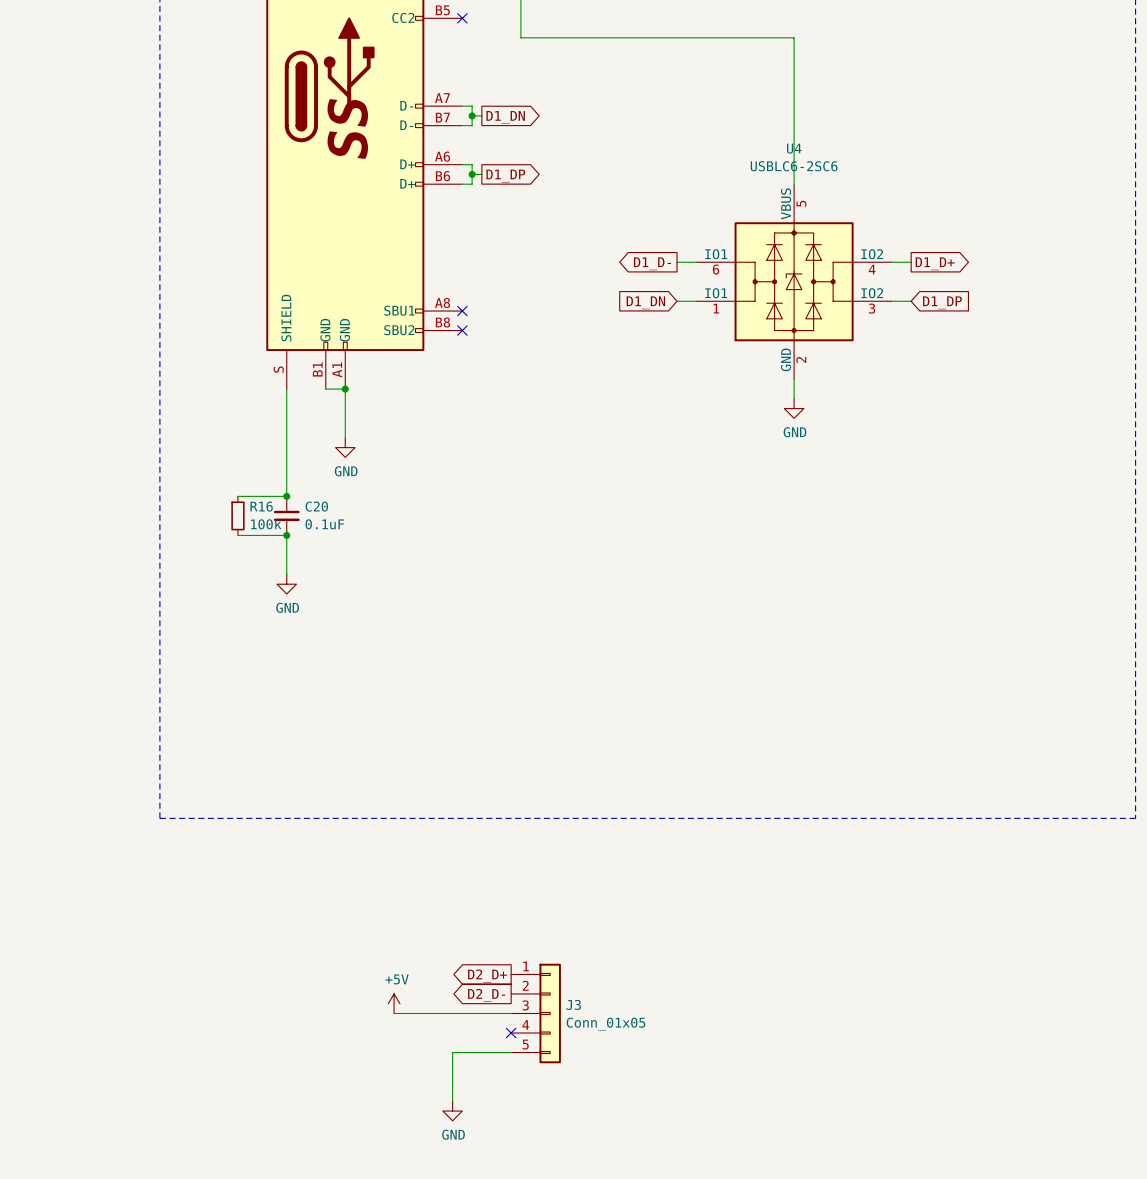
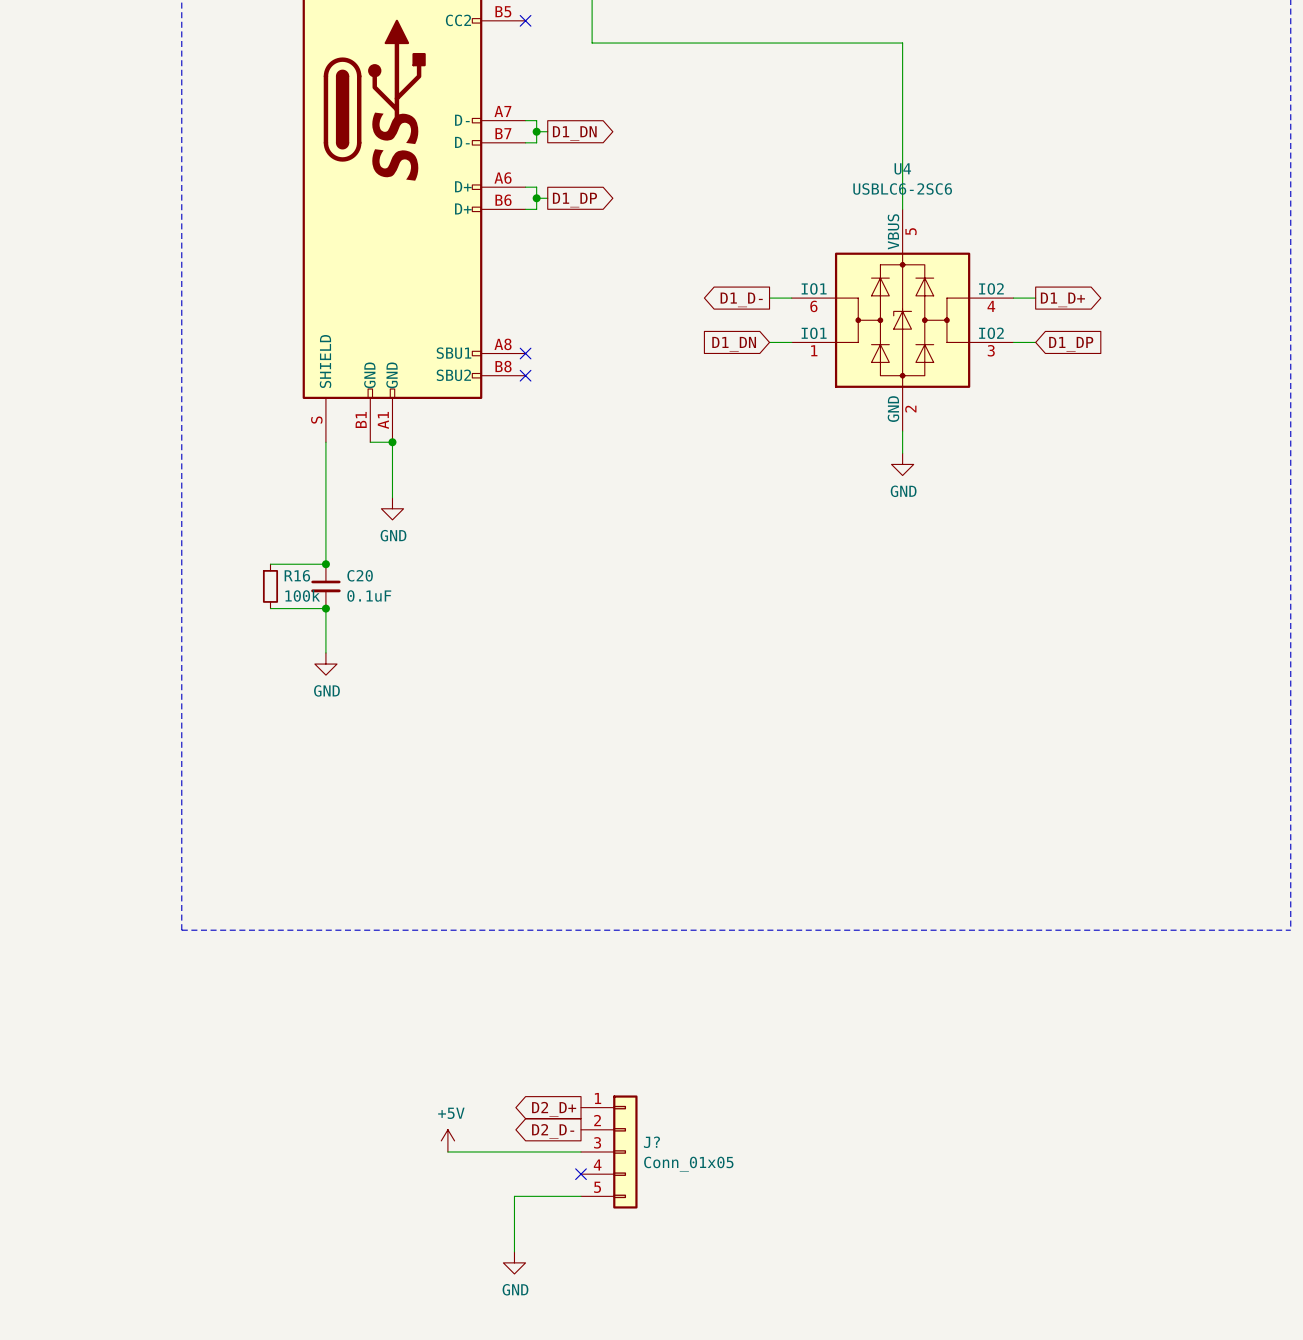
J3 name: J3 (573, 1004) -> J? (651, 1142)

